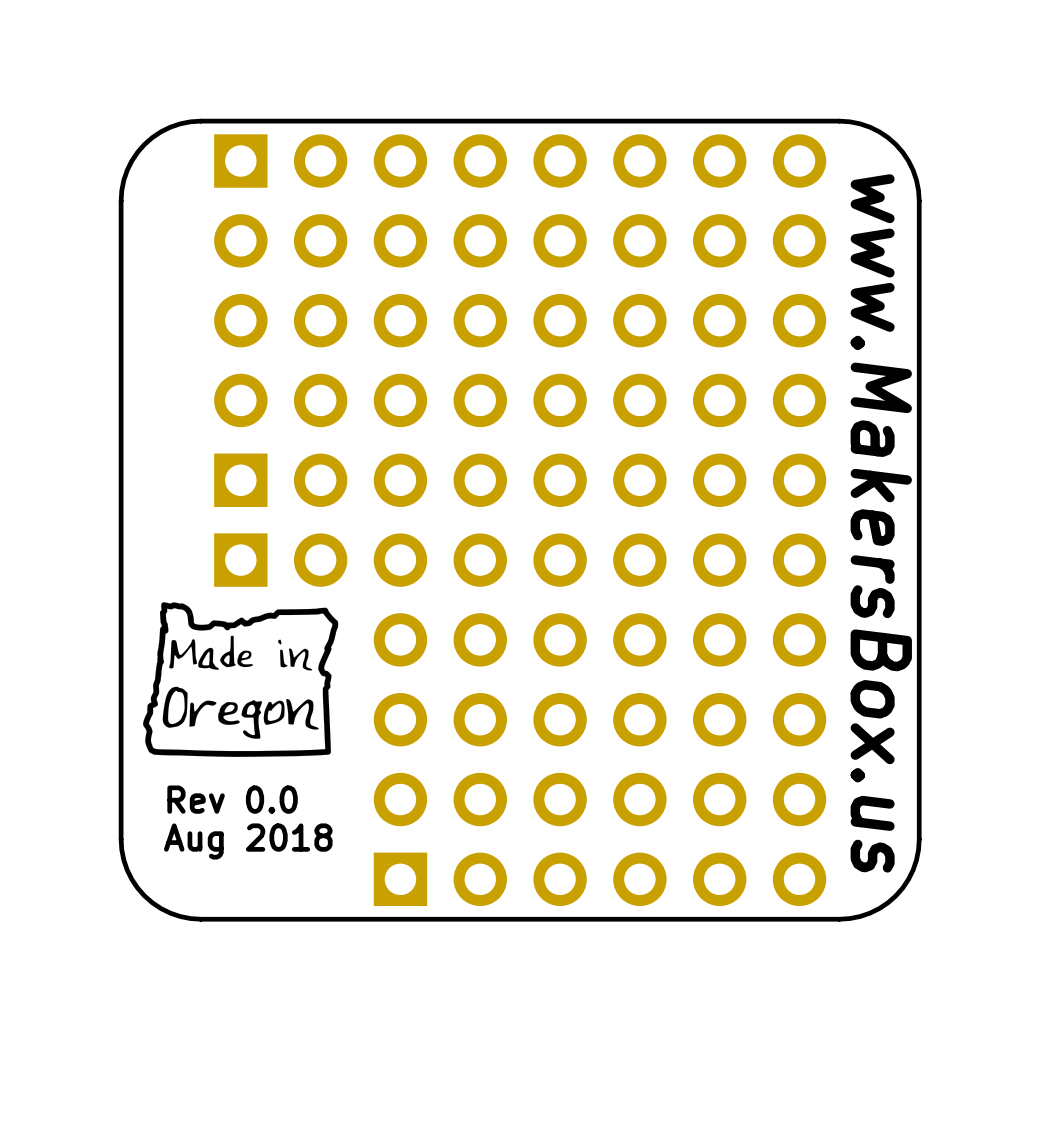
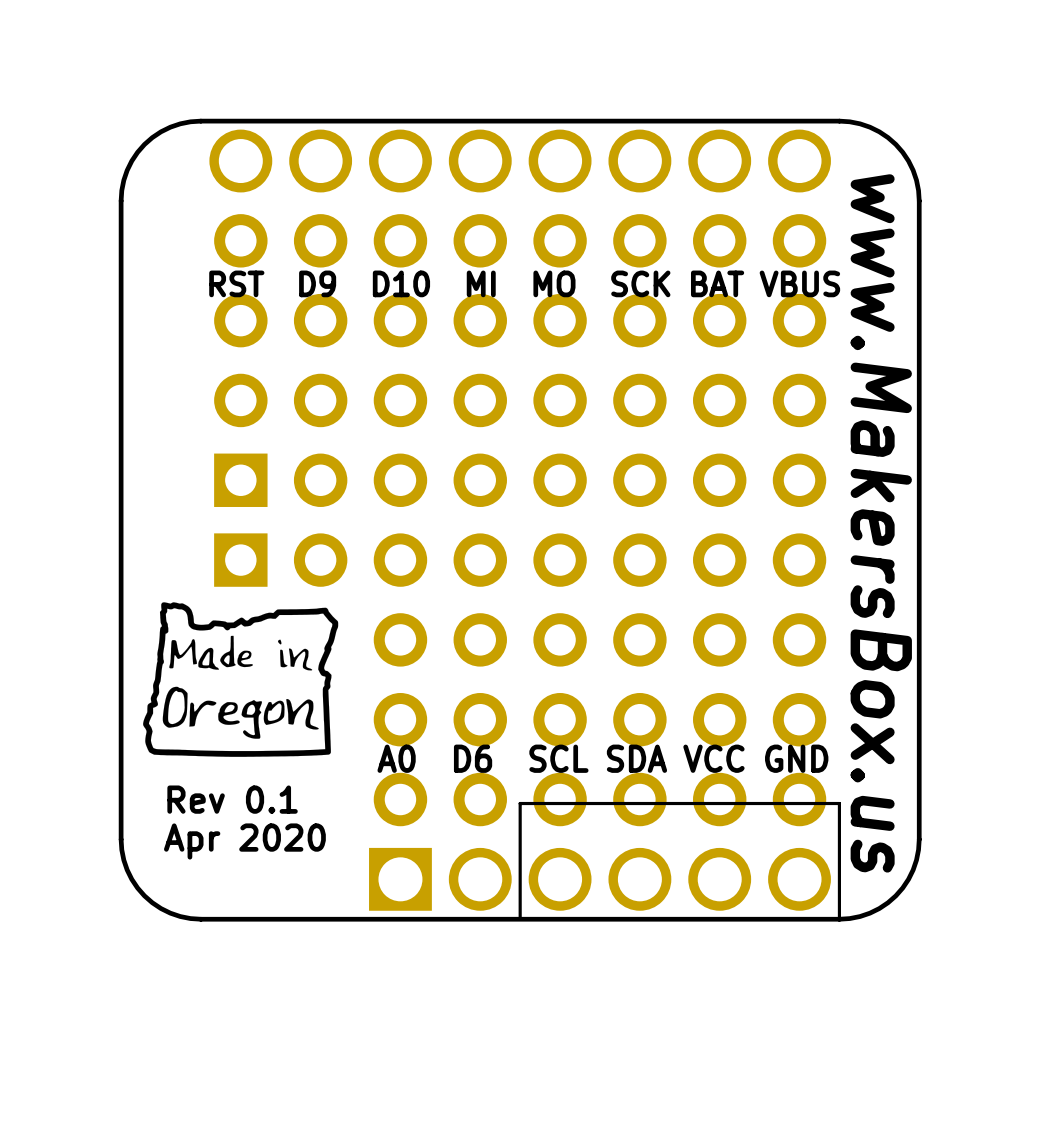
part footprint: [214, 134, 827, 188] -> [209, 129, 831, 193]
text: Rev 0.0 (232, 799) -> Rev 0.1 (232, 799)
text: Aug 2018 (248, 841) -> Apr 2020 (244, 841)
part footprint: [373, 852, 827, 907] -> [369, 801, 842, 921]

